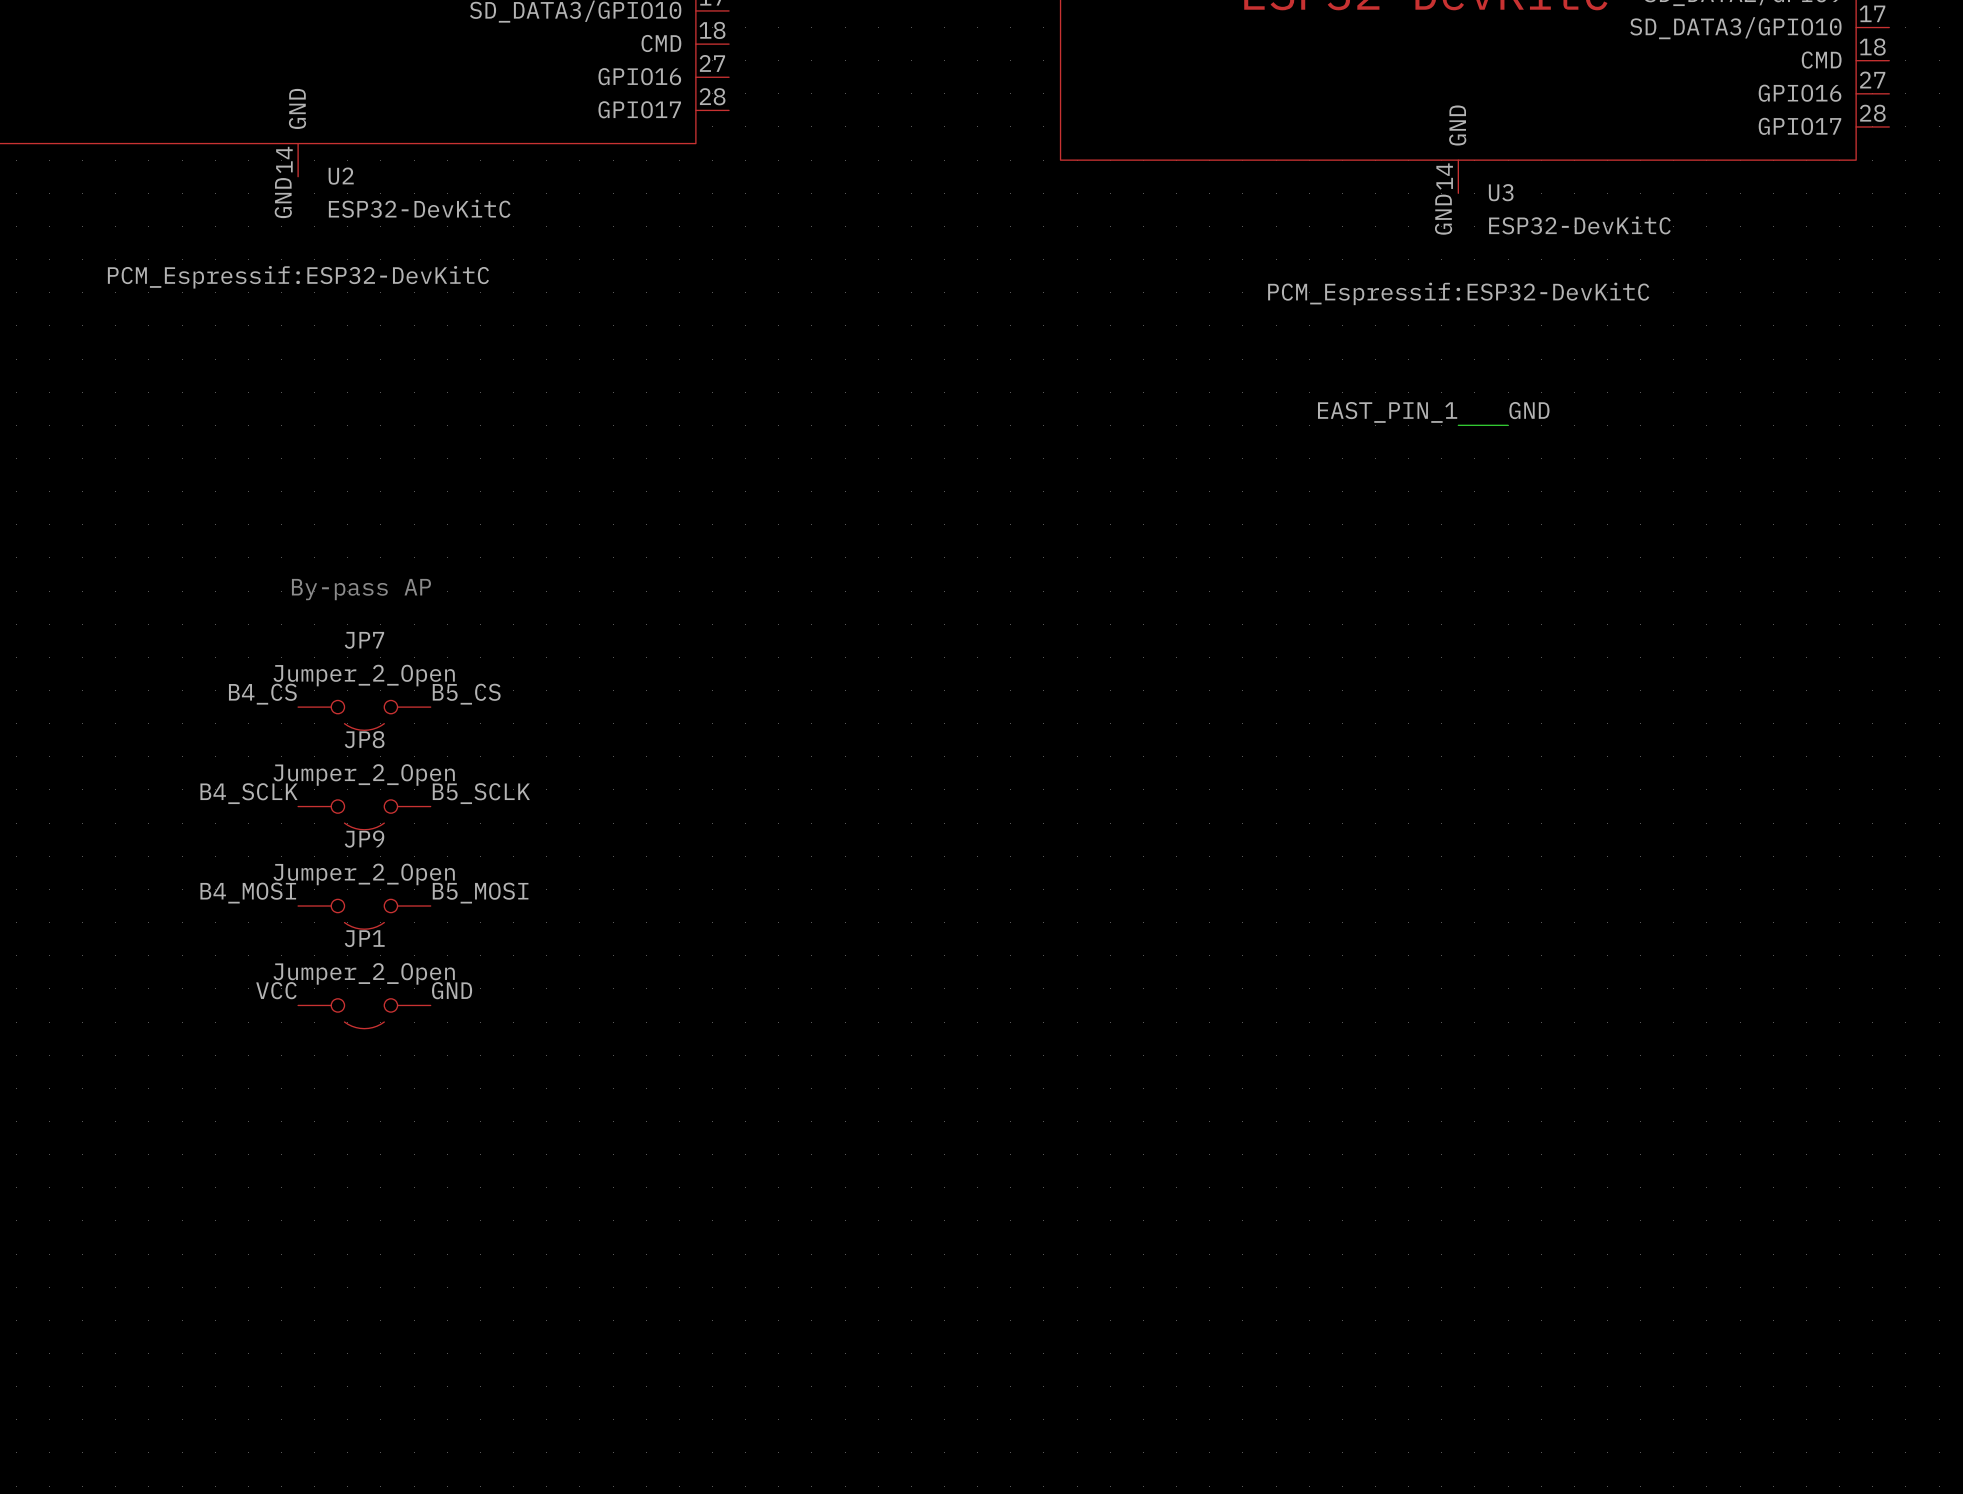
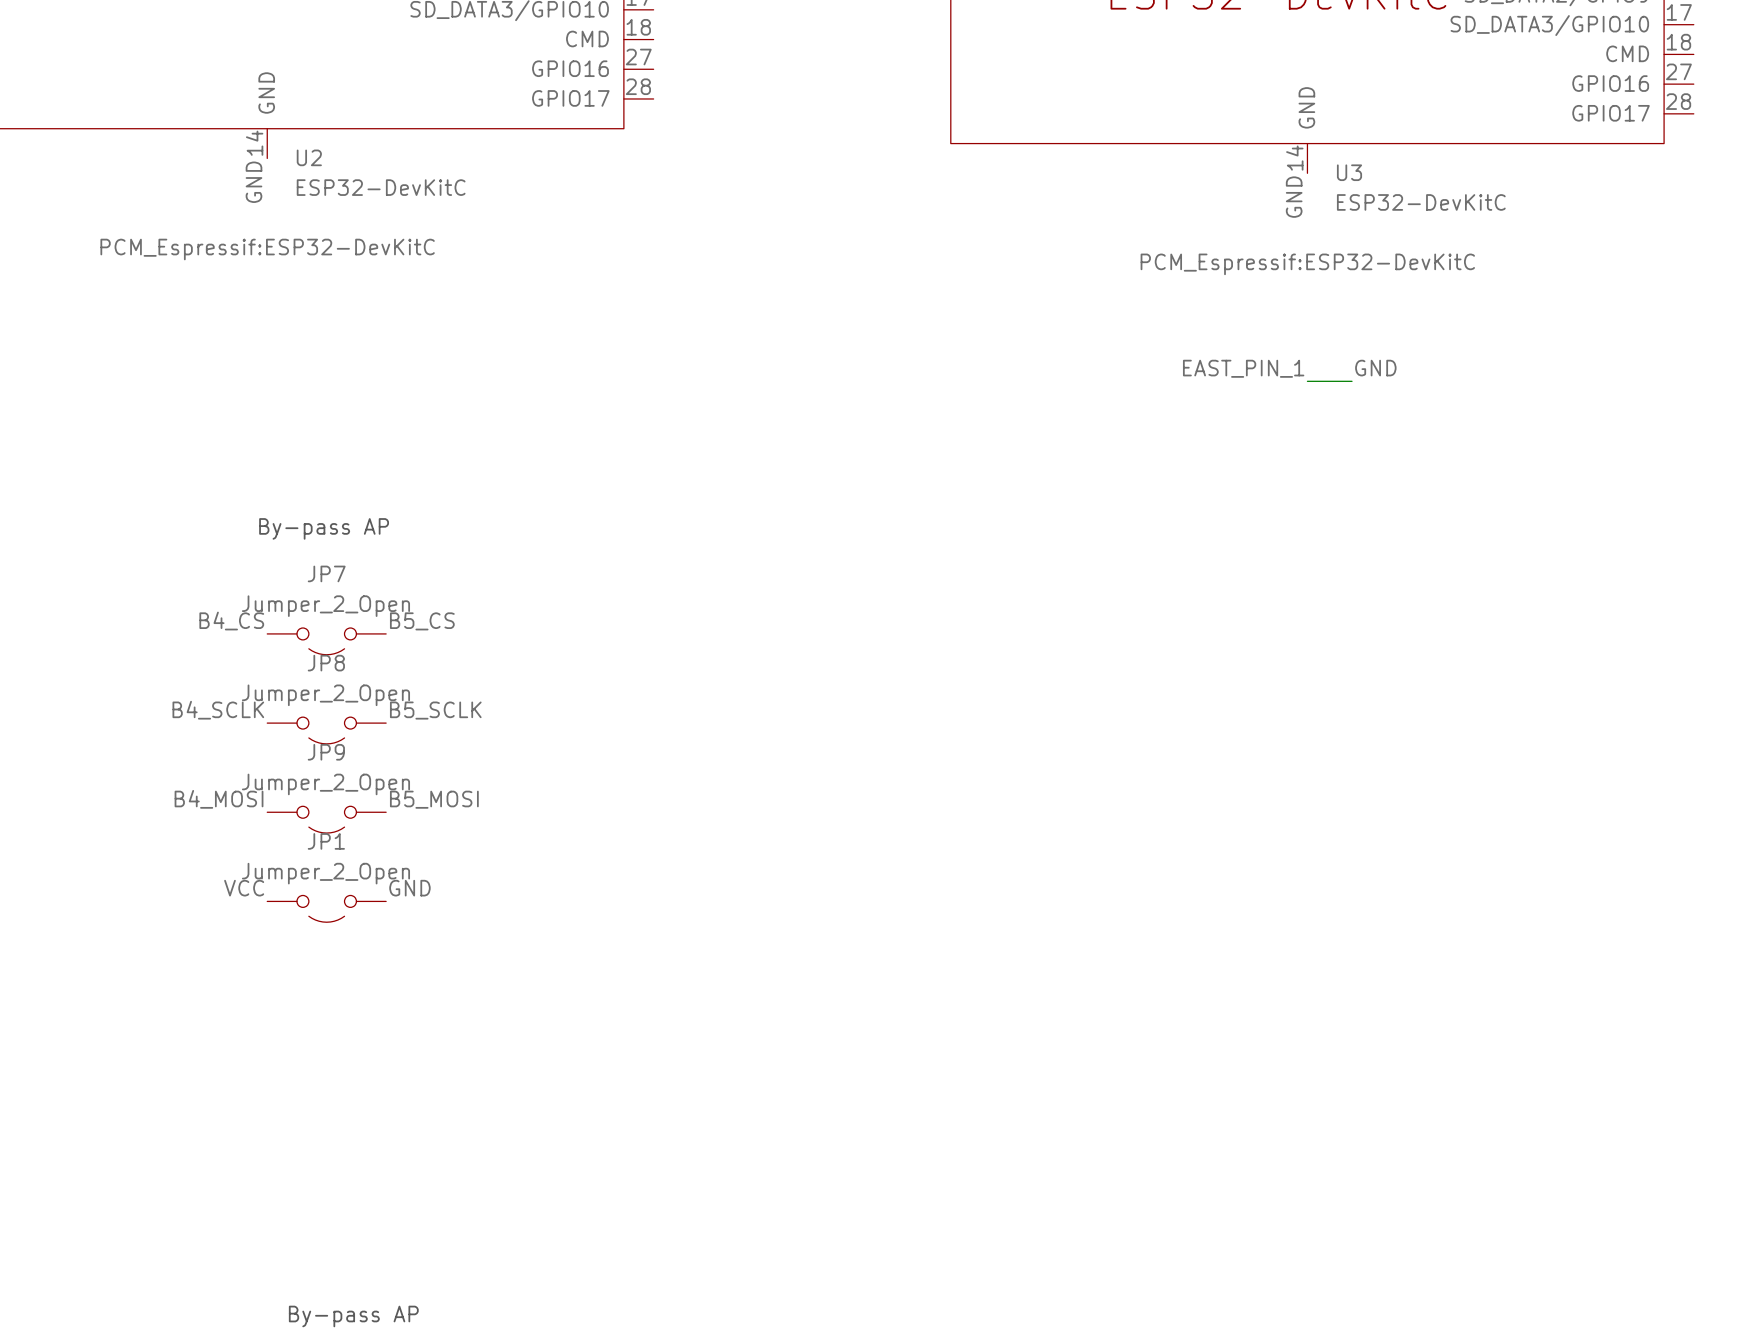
text: none -> By-pass AP (353, 1316)

